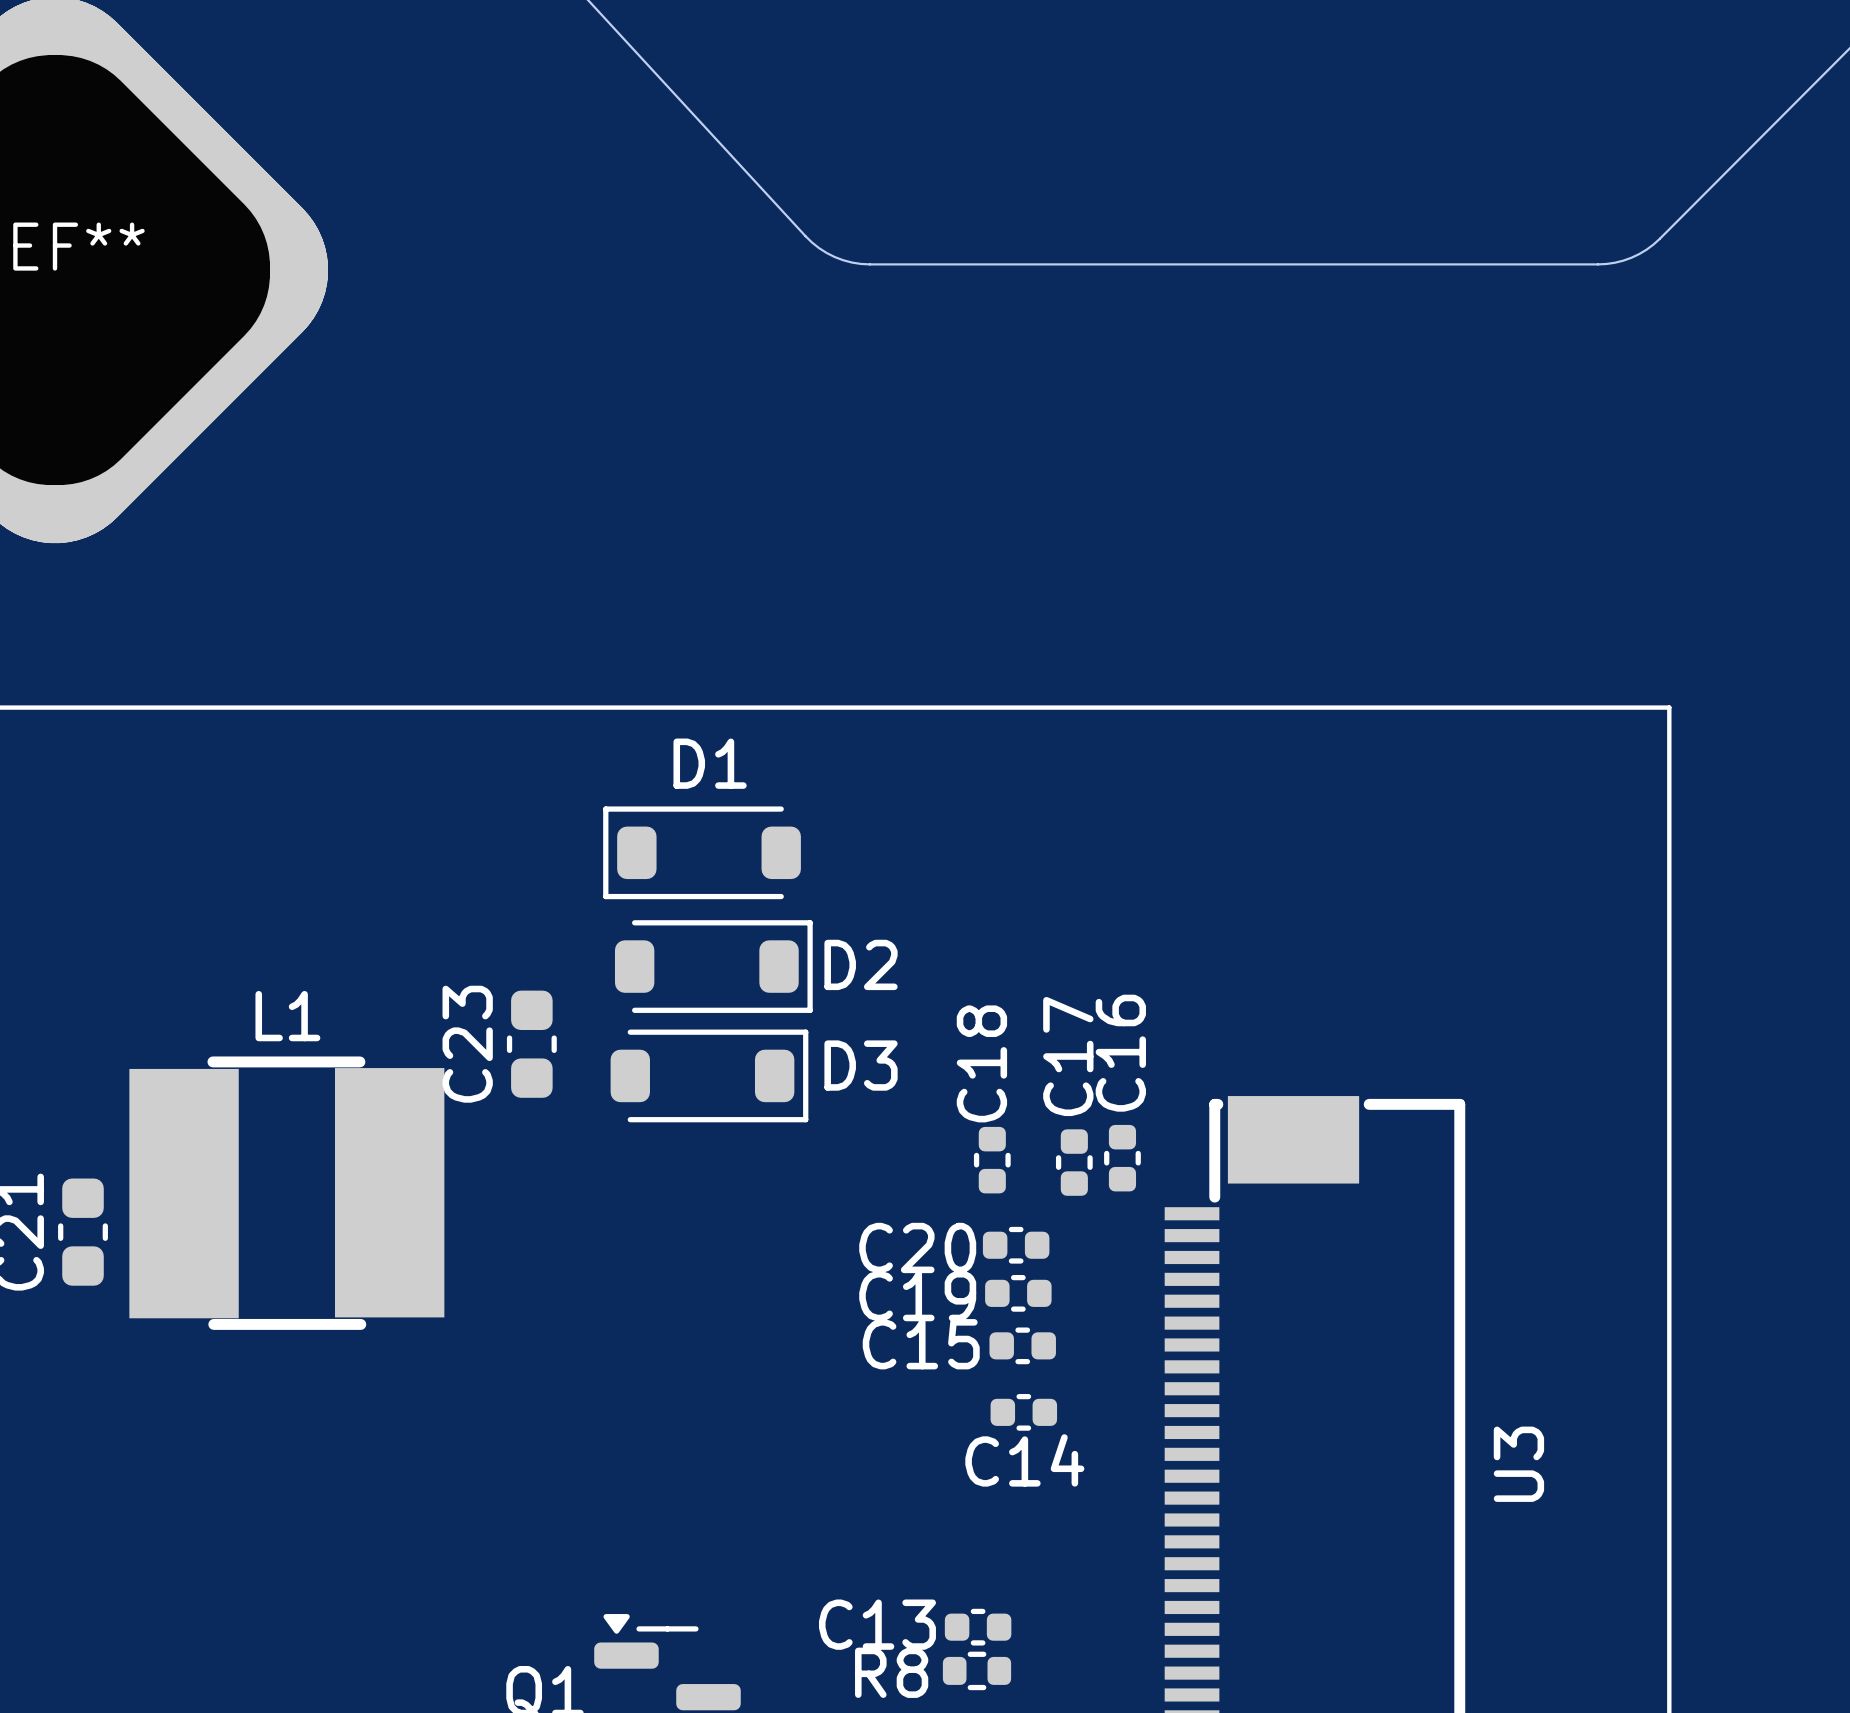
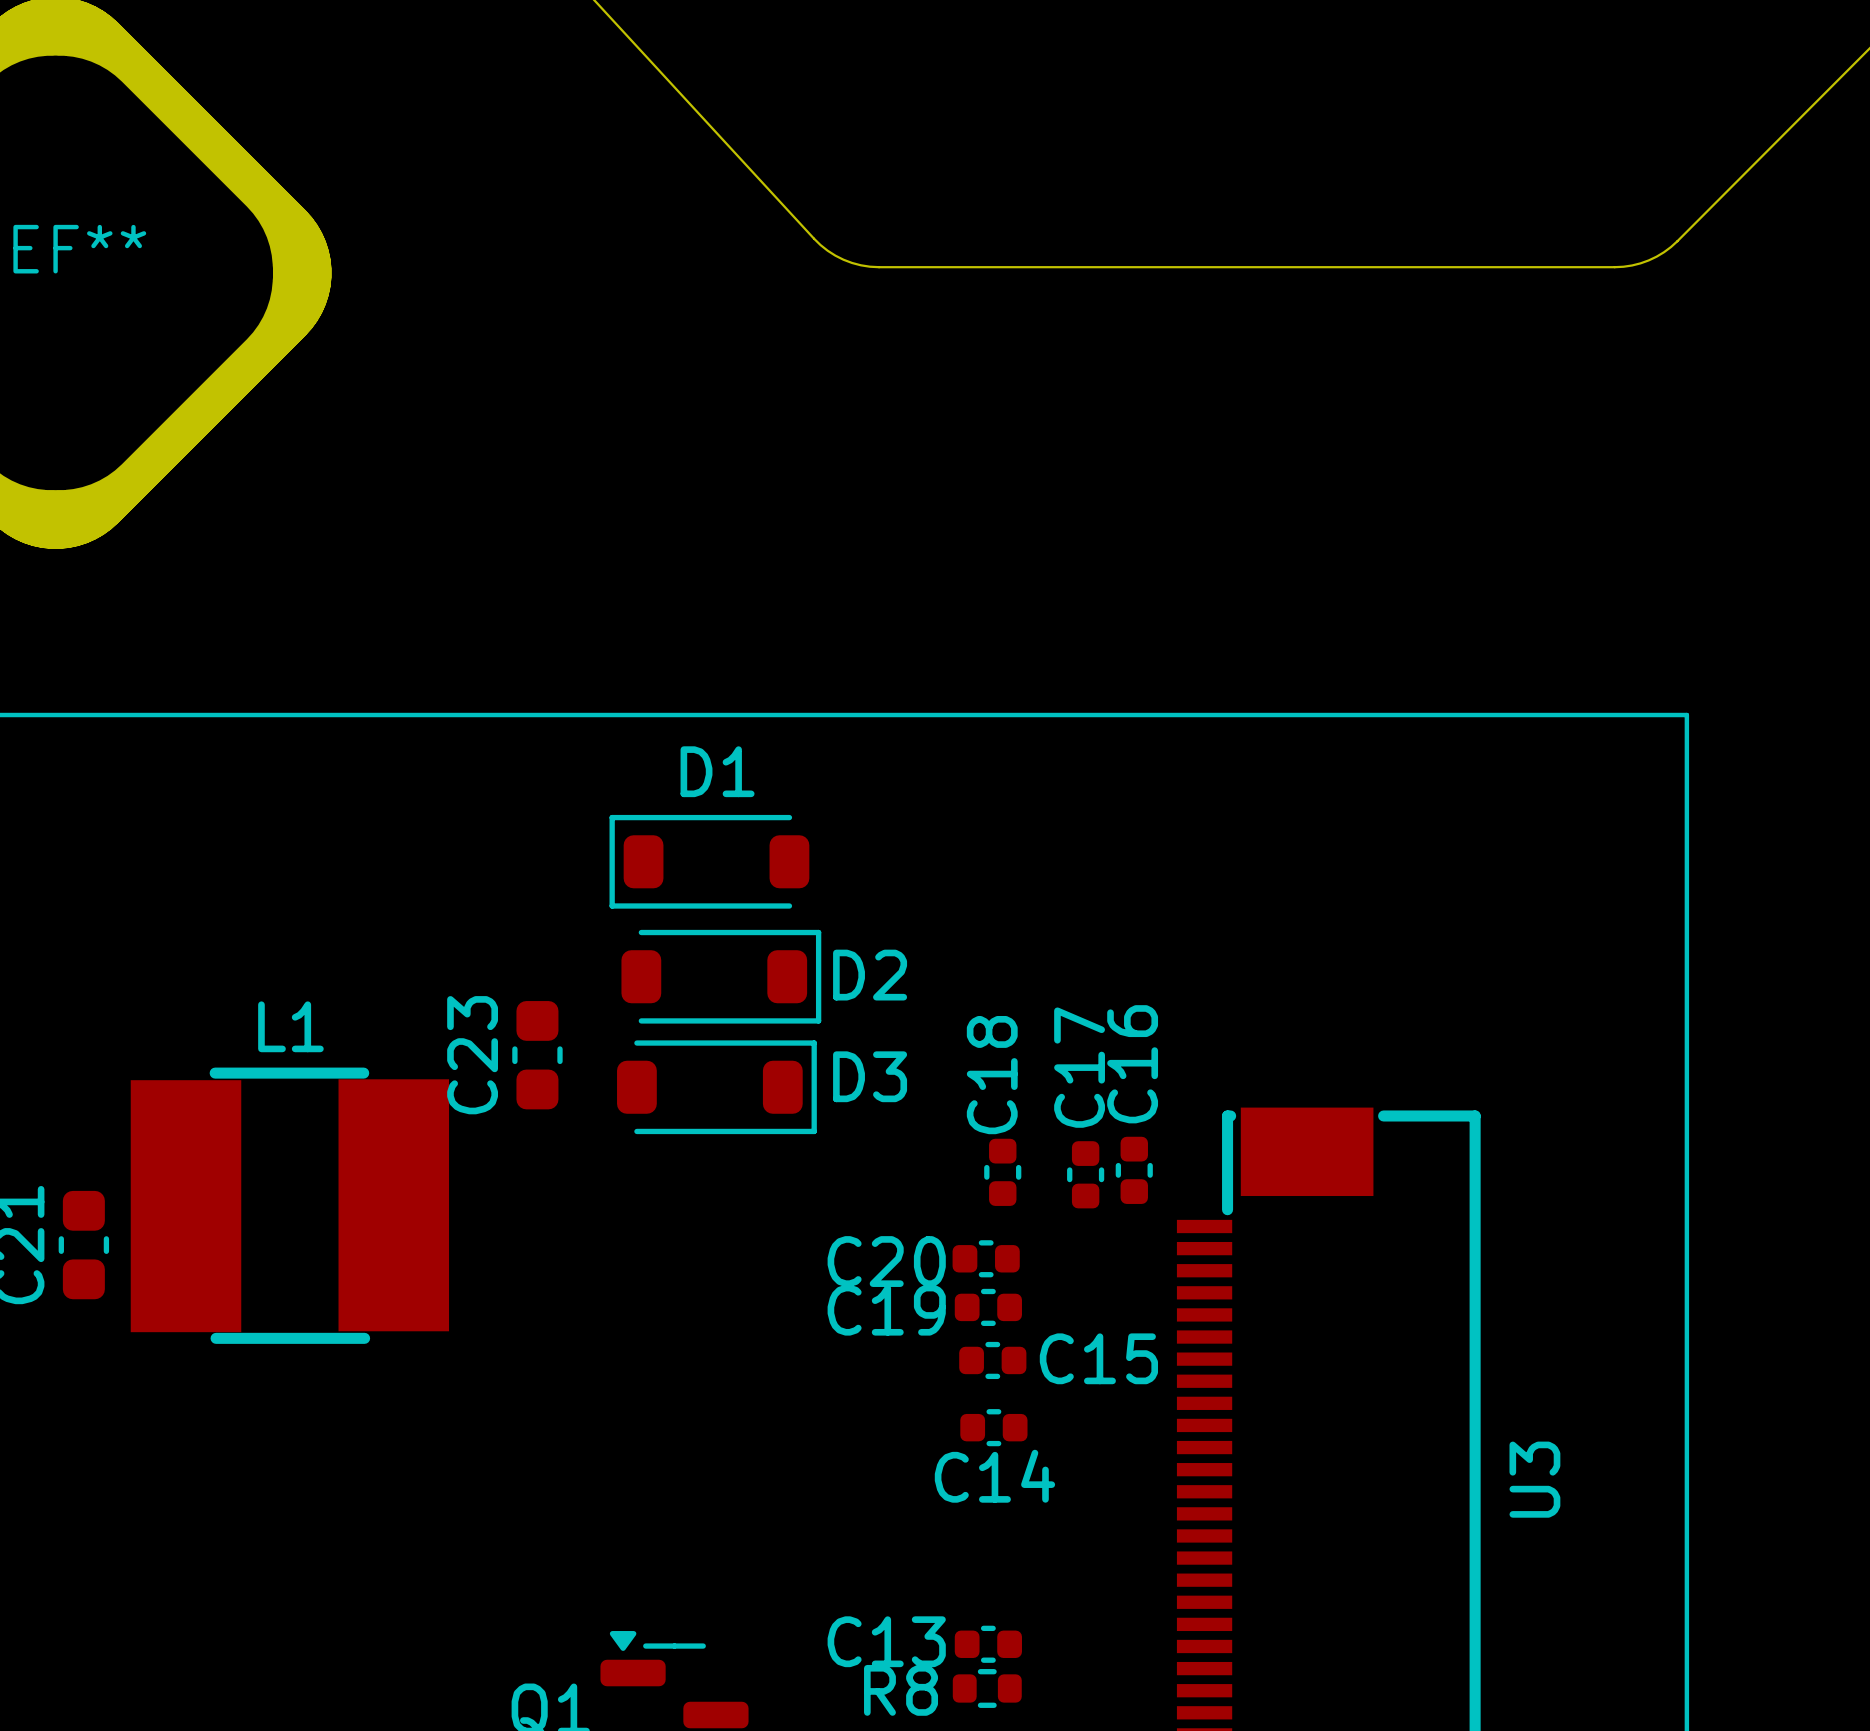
C20 position: (1016, 1245) -> (986, 1258)
C19 position: (1018, 1293) -> (988, 1307)
C15 name position: C15 (921, 1344) -> C15 (1098, 1358)
C15 position: (1022, 1345) -> (992, 1360)
C14 position: (1023, 1412) -> (993, 1427)

